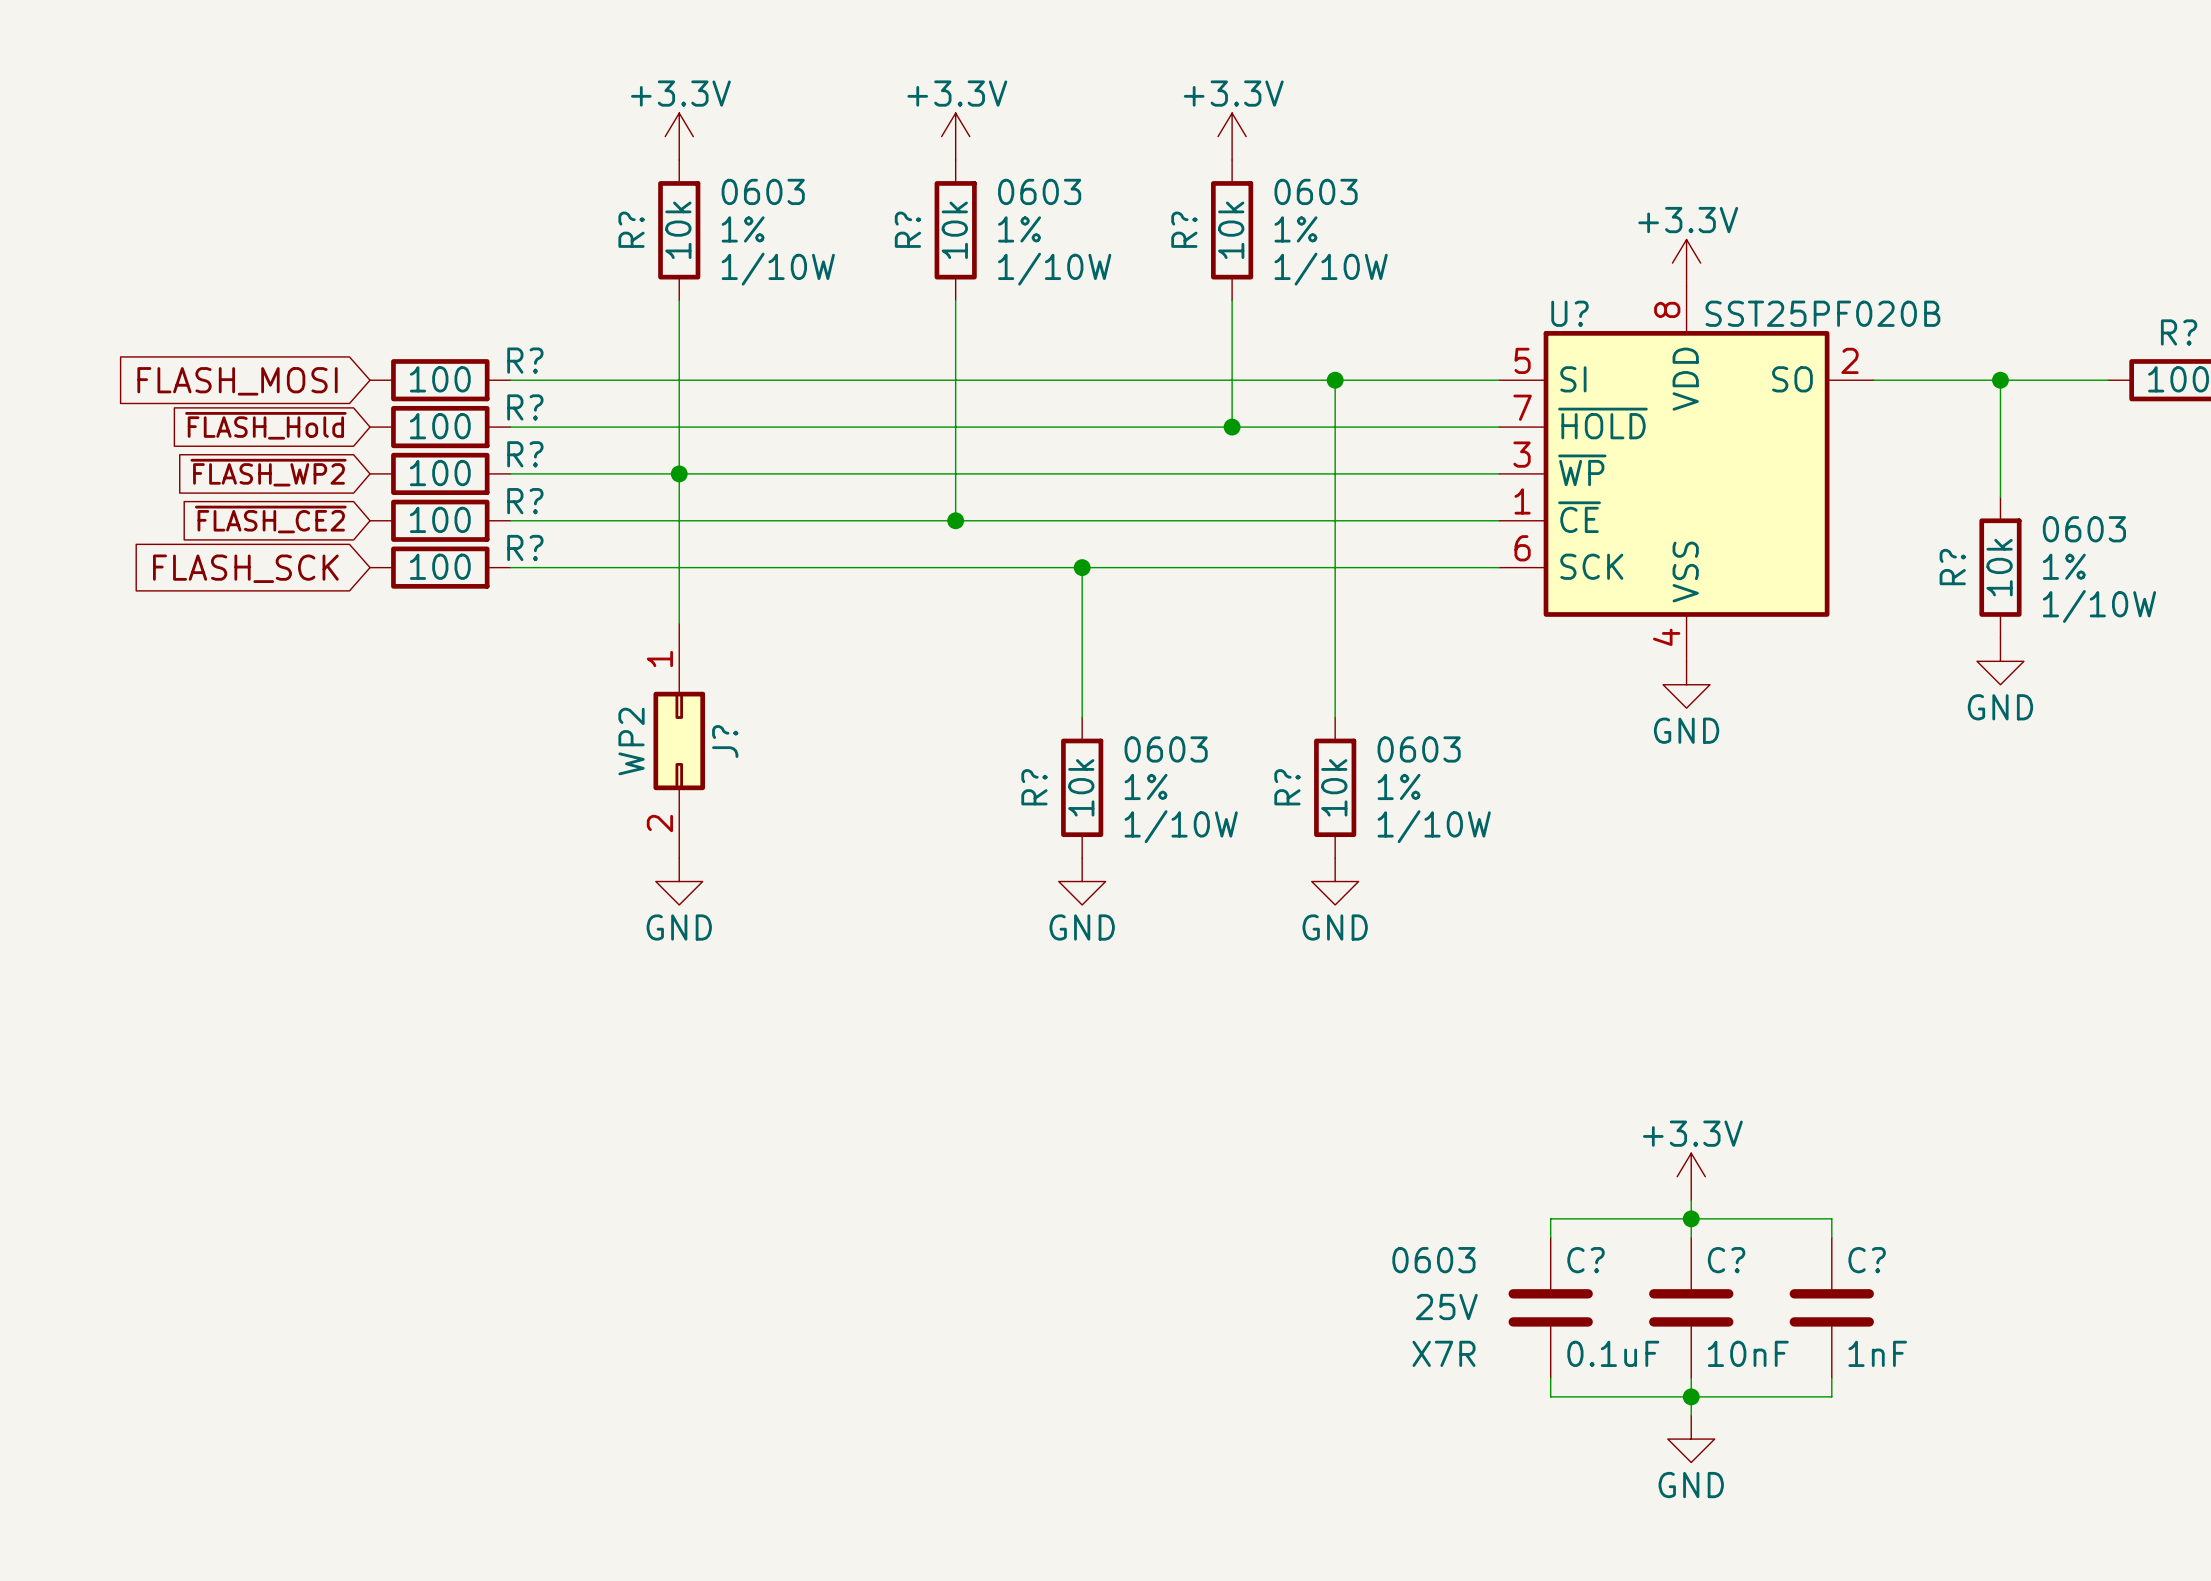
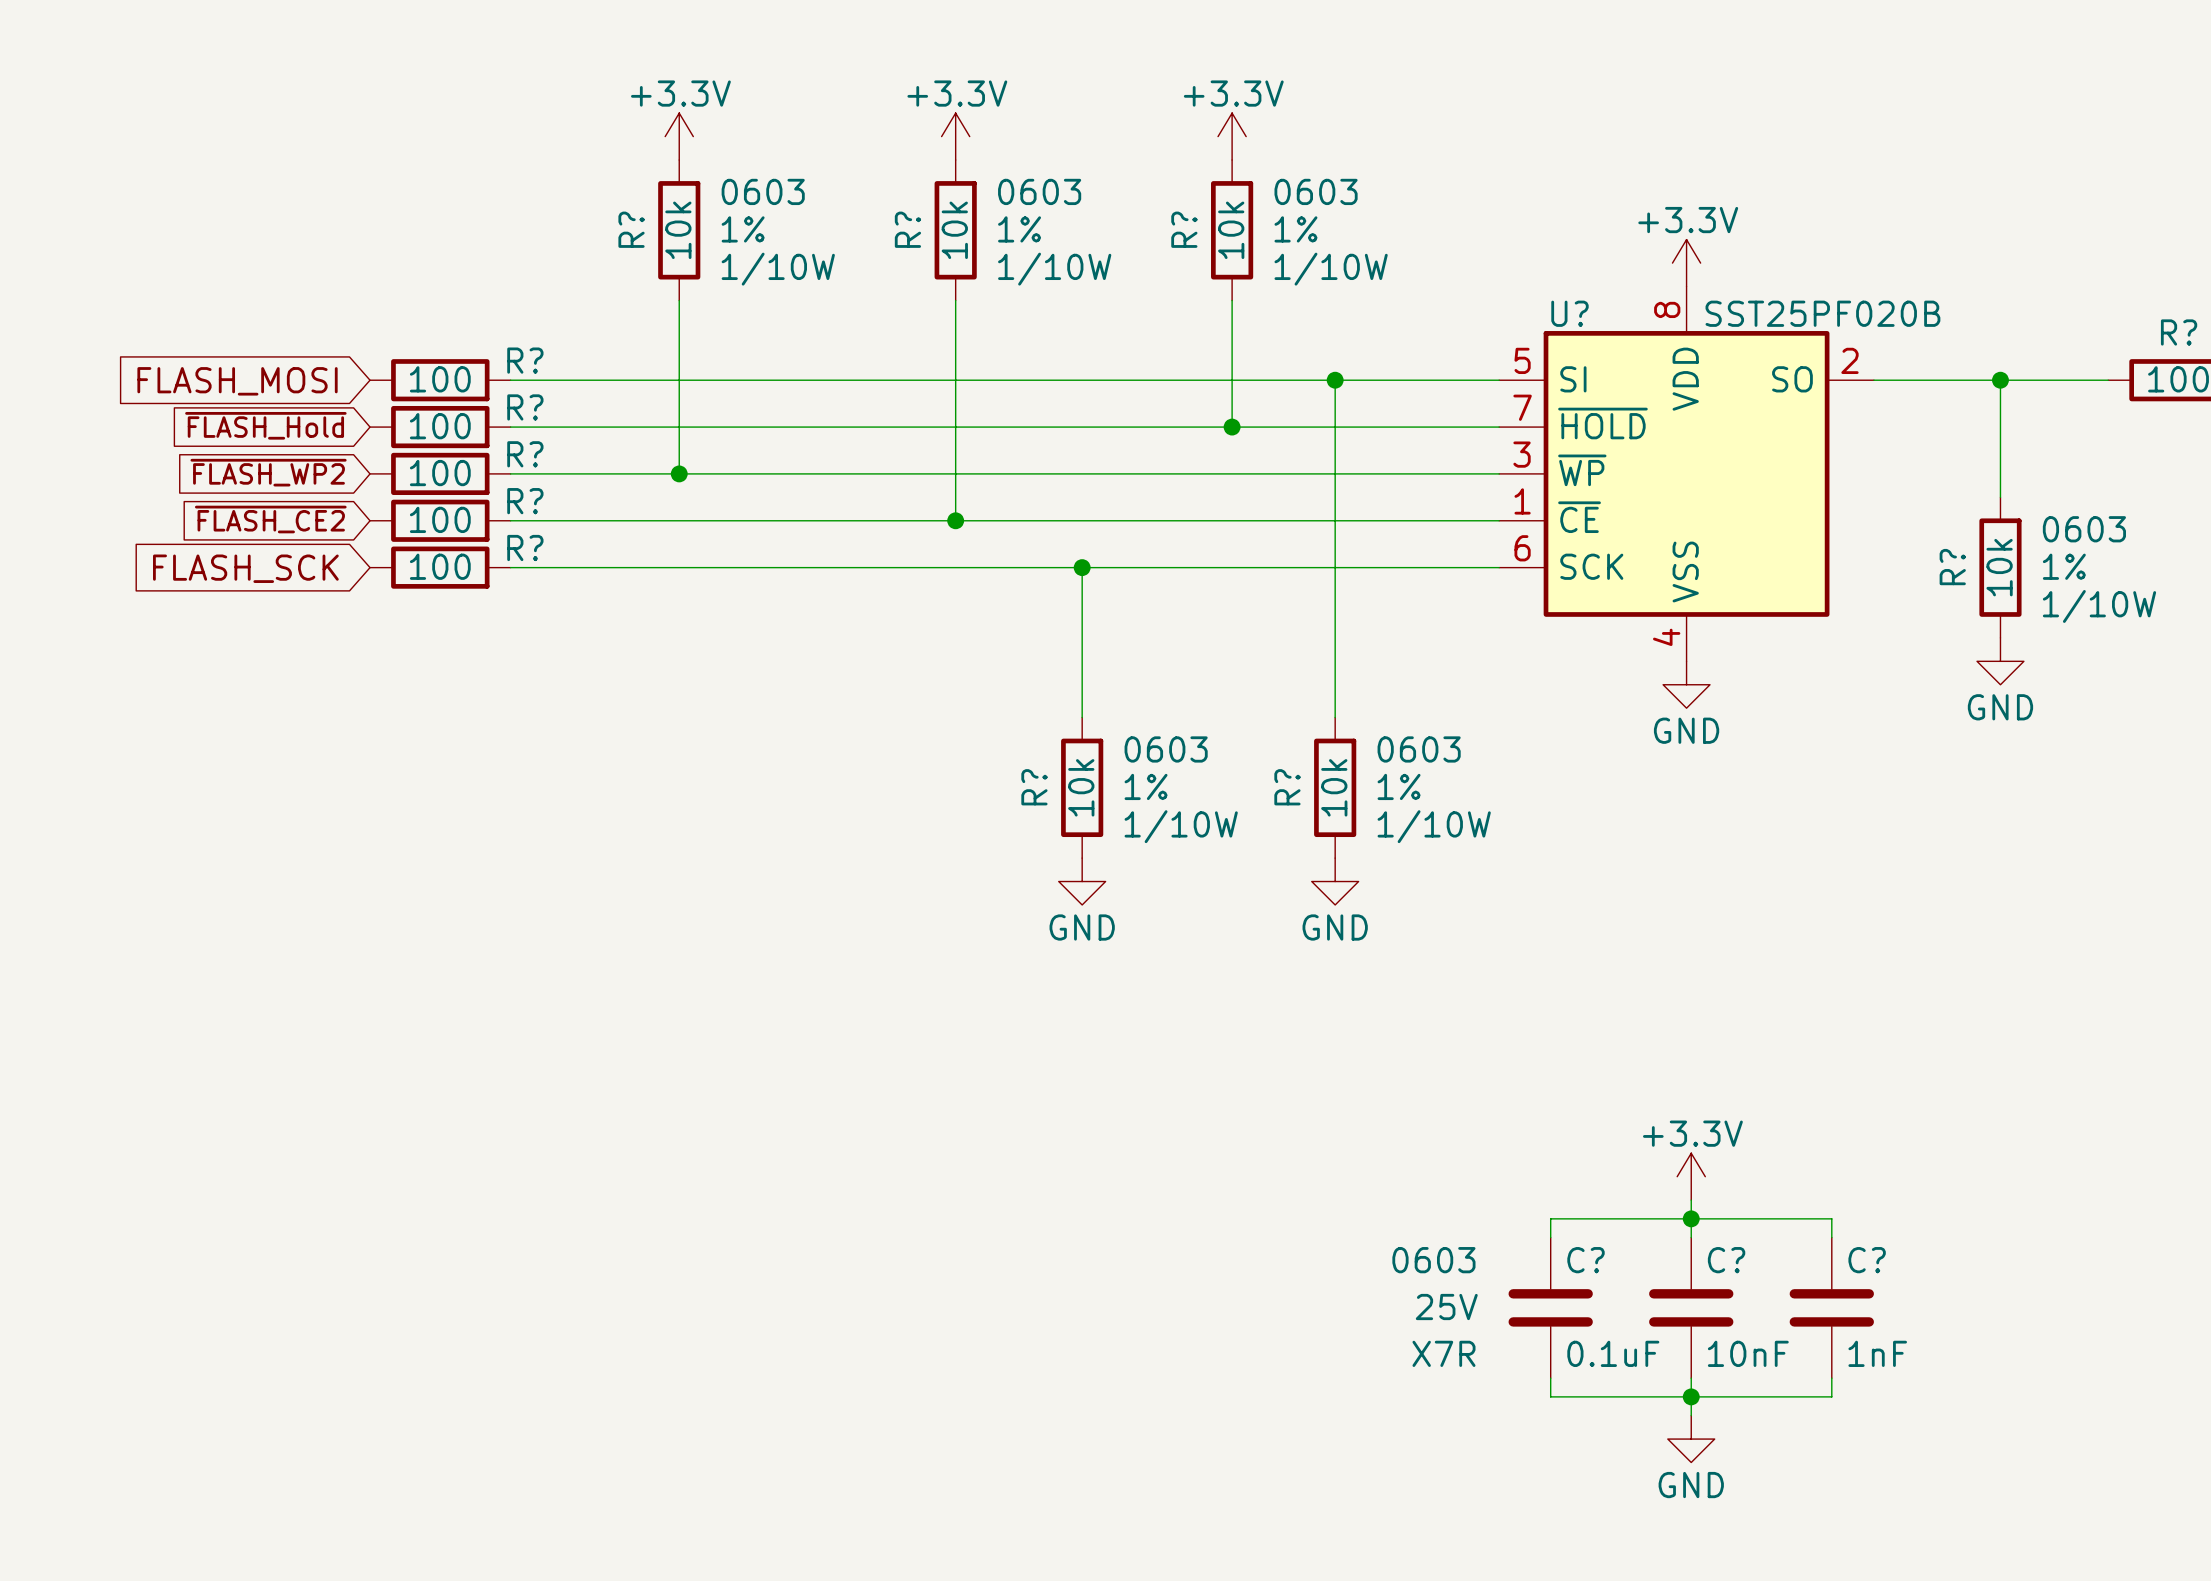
wire: (679, 473) (679, 623) -> none
J?: WP2 (679, 740) -> none
power symbol: GND (679, 881) -> none

